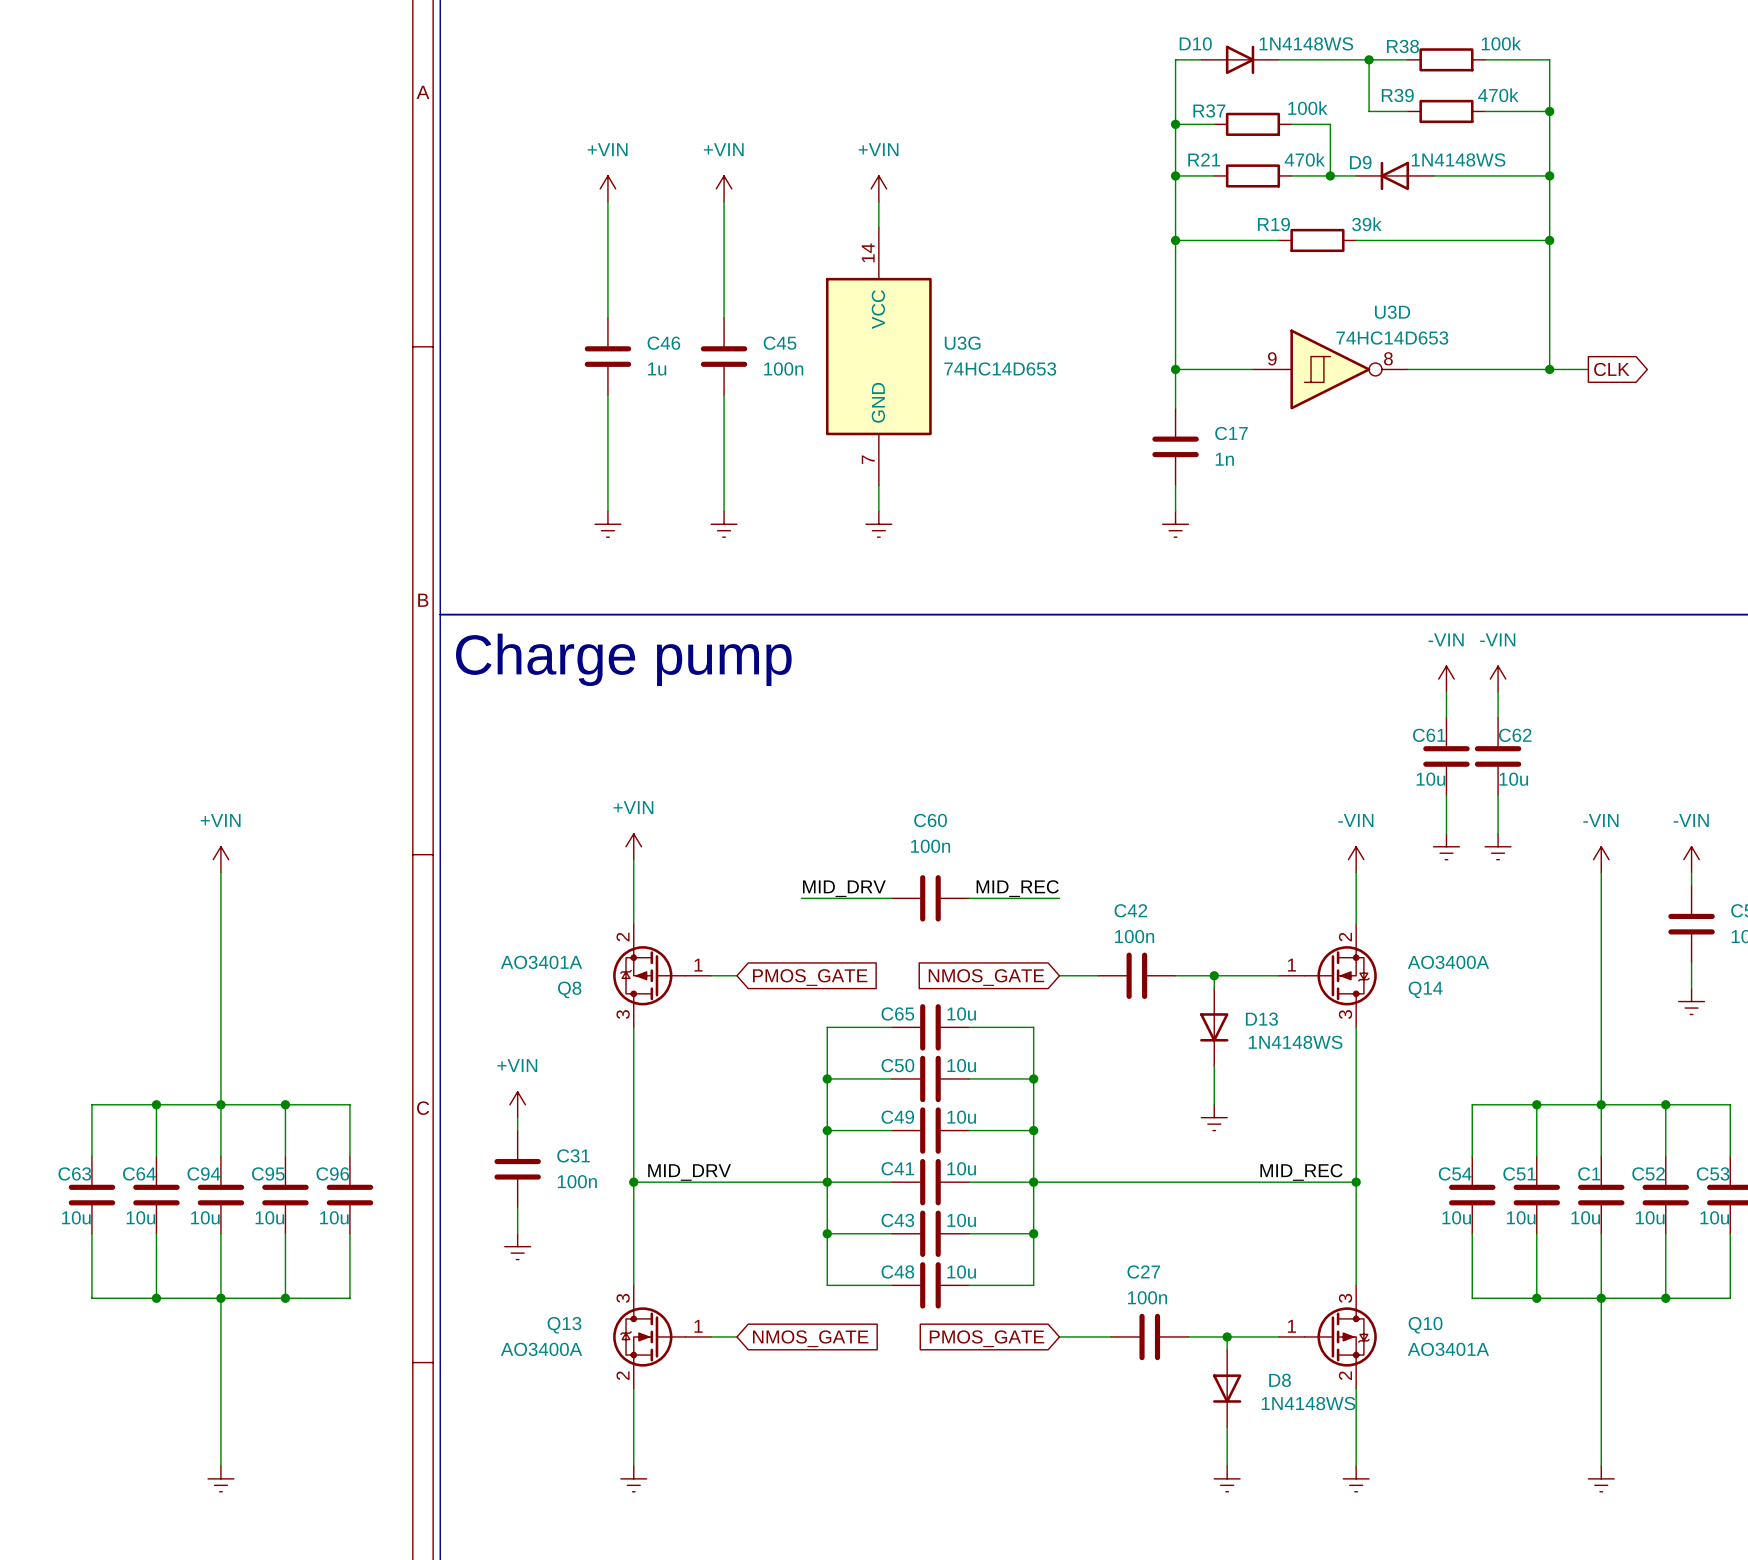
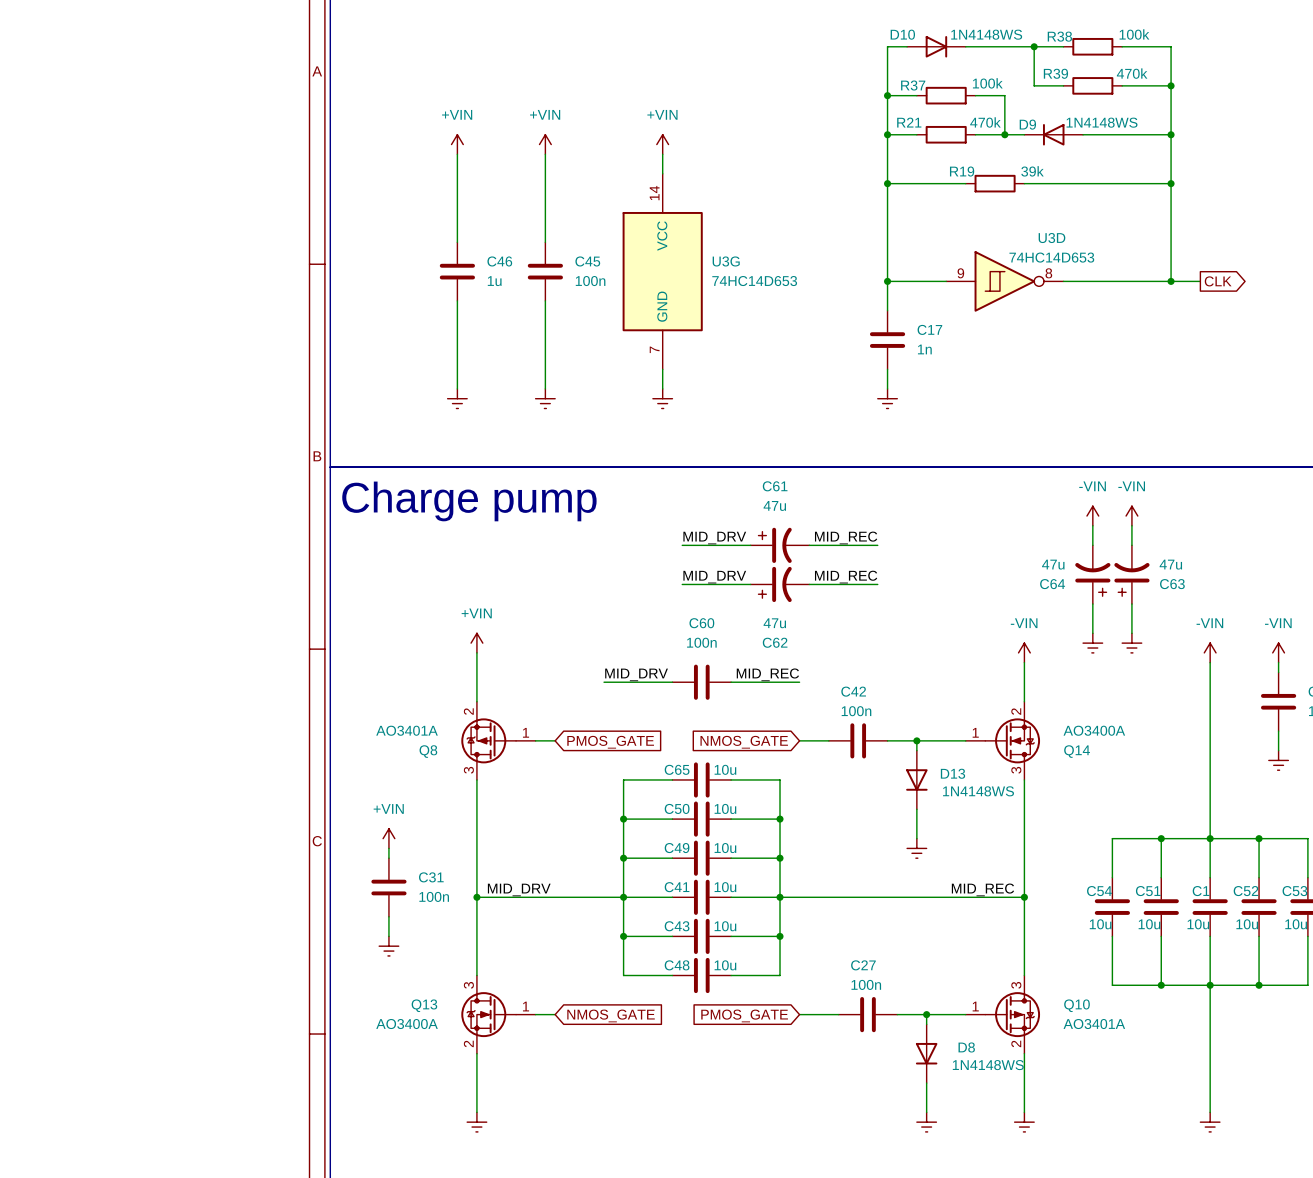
label: none -> MID_DRV (714, 538)
label: none -> MID_REC (846, 537)
wire: none -> (682, 545) (750, 545)
wire: none -> (809, 545) (877, 545)
C61 symbol: [1423, 717, 1470, 796] -> [750, 527, 810, 563]
C62 symbol: [1474, 717, 1522, 796] -> [750, 566, 810, 603]
C61 name position: C61 (1429, 735) -> C61 (775, 486)
C62 name position: C62 (1515, 735) -> C62 (775, 642)
label: none -> MID_DRV (714, 577)
label: none -> MID_REC (846, 577)
wire: none -> (682, 584) (750, 584)
wire: none -> (809, 584) (877, 584)
C61 value: 10u (1430, 779) -> 47u (774, 505)
C62 value: 10u (1513, 779) -> 47u (774, 623)
power symbol: +VIN (220, 859) -> none
wire: (220, 872) (220, 1156) -> none
wire: (156, 1104) (156, 1156) -> none
junction: (156, 1104) -> none
junction: (220, 1104) -> none
wire: (285, 1104) (285, 1156) -> none
junction: (285, 1104) -> none
C63 symbol: [68, 1156, 116, 1234] -> [1114, 545, 1150, 605]
wire: (91, 1156) (91, 1104) (349, 1104) (349, 1156) -> none
C64 symbol: [133, 1156, 180, 1234] -> [1075, 545, 1111, 605]
C63 name position: C63 (74, 1173) -> C63 (1172, 584)
C64 name position: C64 (139, 1173) -> C64 (1052, 584)
C94: 10u (220, 1195) -> none
C95: 10u (285, 1195) -> none
C96: 10u (349, 1195) -> none
C63 value: 10u (76, 1217) -> 47u (1170, 564)
C64 value: 10u (140, 1217) -> 47u (1053, 564)
wire: (91, 1233) (91, 1298) (349, 1298) (349, 1233) -> none
wire: (156, 1233) (156, 1298) -> none
wire: (220, 1233) (220, 1465) -> none
wire: (285, 1233) (285, 1298) -> none
junction: (156, 1298) -> none
junction: (220, 1298) -> none
junction: (285, 1298) -> none
power symbol: (220, 1478) -> none

